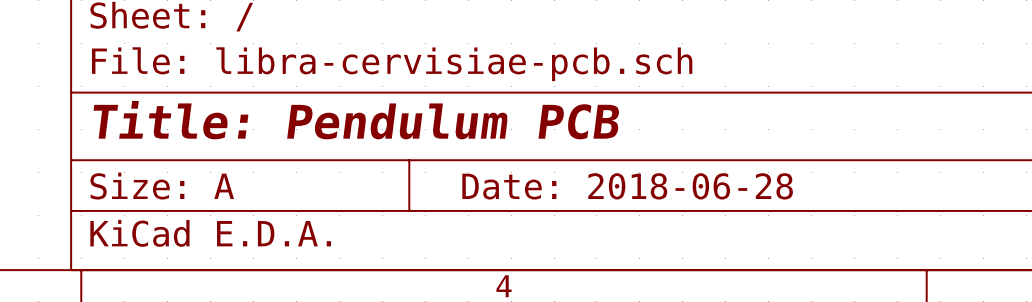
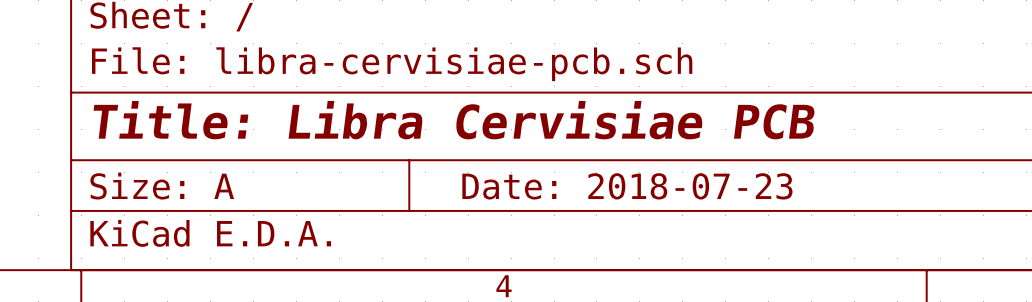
title block: Title: Pendulum PCB (356, 120) -> Title: Libra Cervisiae PCB (454, 120)
title block: Date: 2018-06-28 (627, 186) -> Date: 2018-07-23 (627, 186)

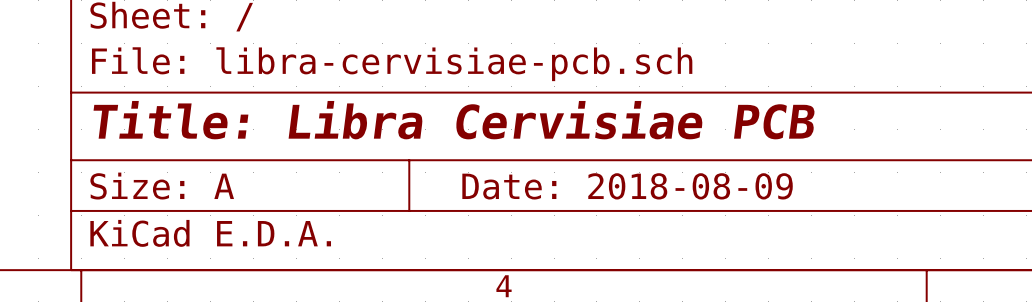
title block: Date: 2018-07-23 (627, 186) -> Date: 2018-08-09 (627, 186)

